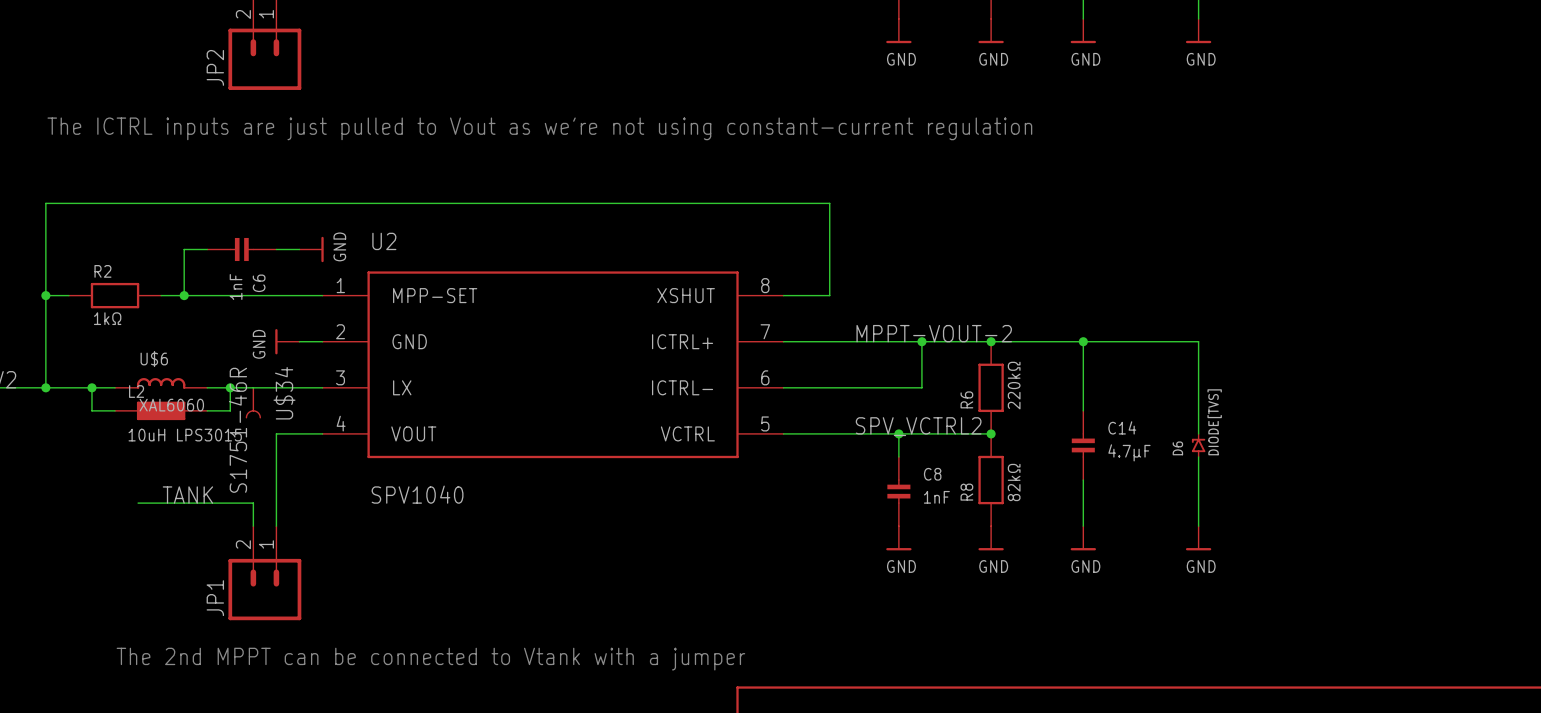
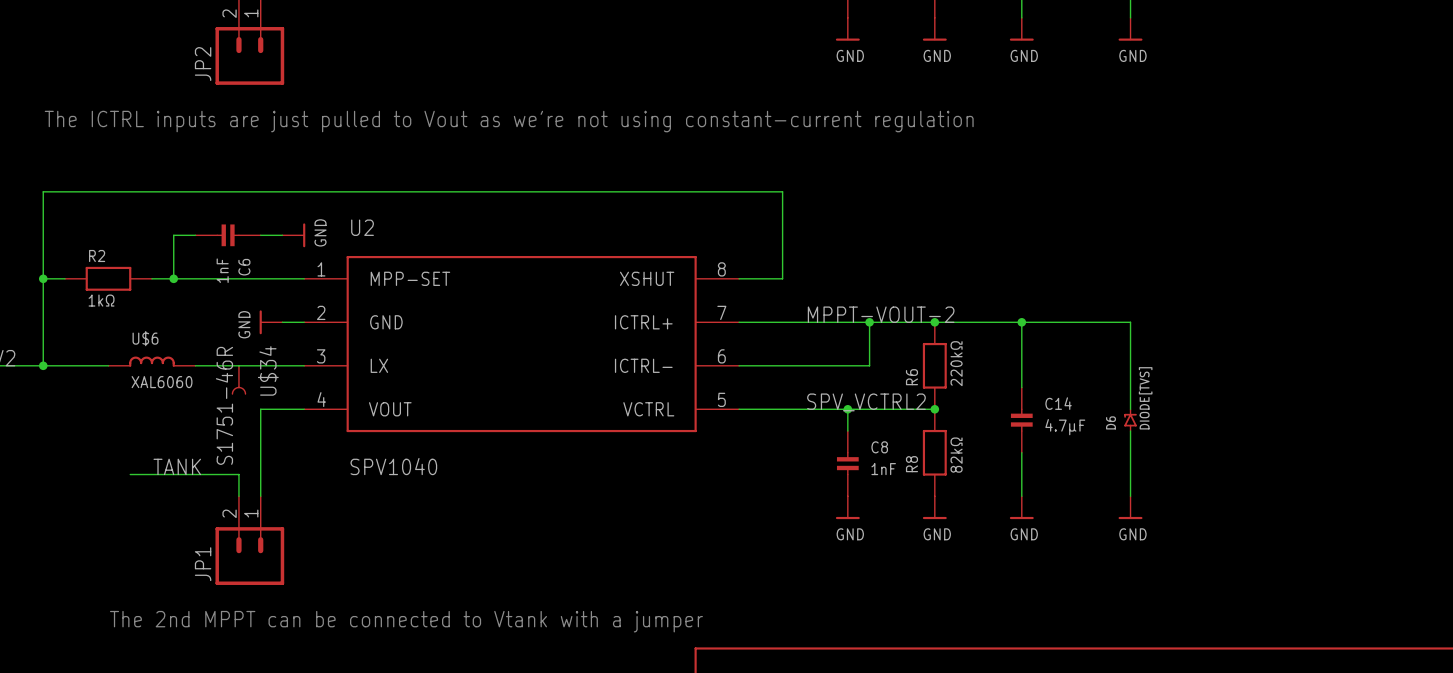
wire: (91, 387) (91, 410) (115, 410) -> none
junction: (91, 387) -> none
wire: (230, 387) (230, 410) (207, 410) -> none
junction: (230, 387) -> none
L2: 10uH LPS3015 (161, 410) -> none

